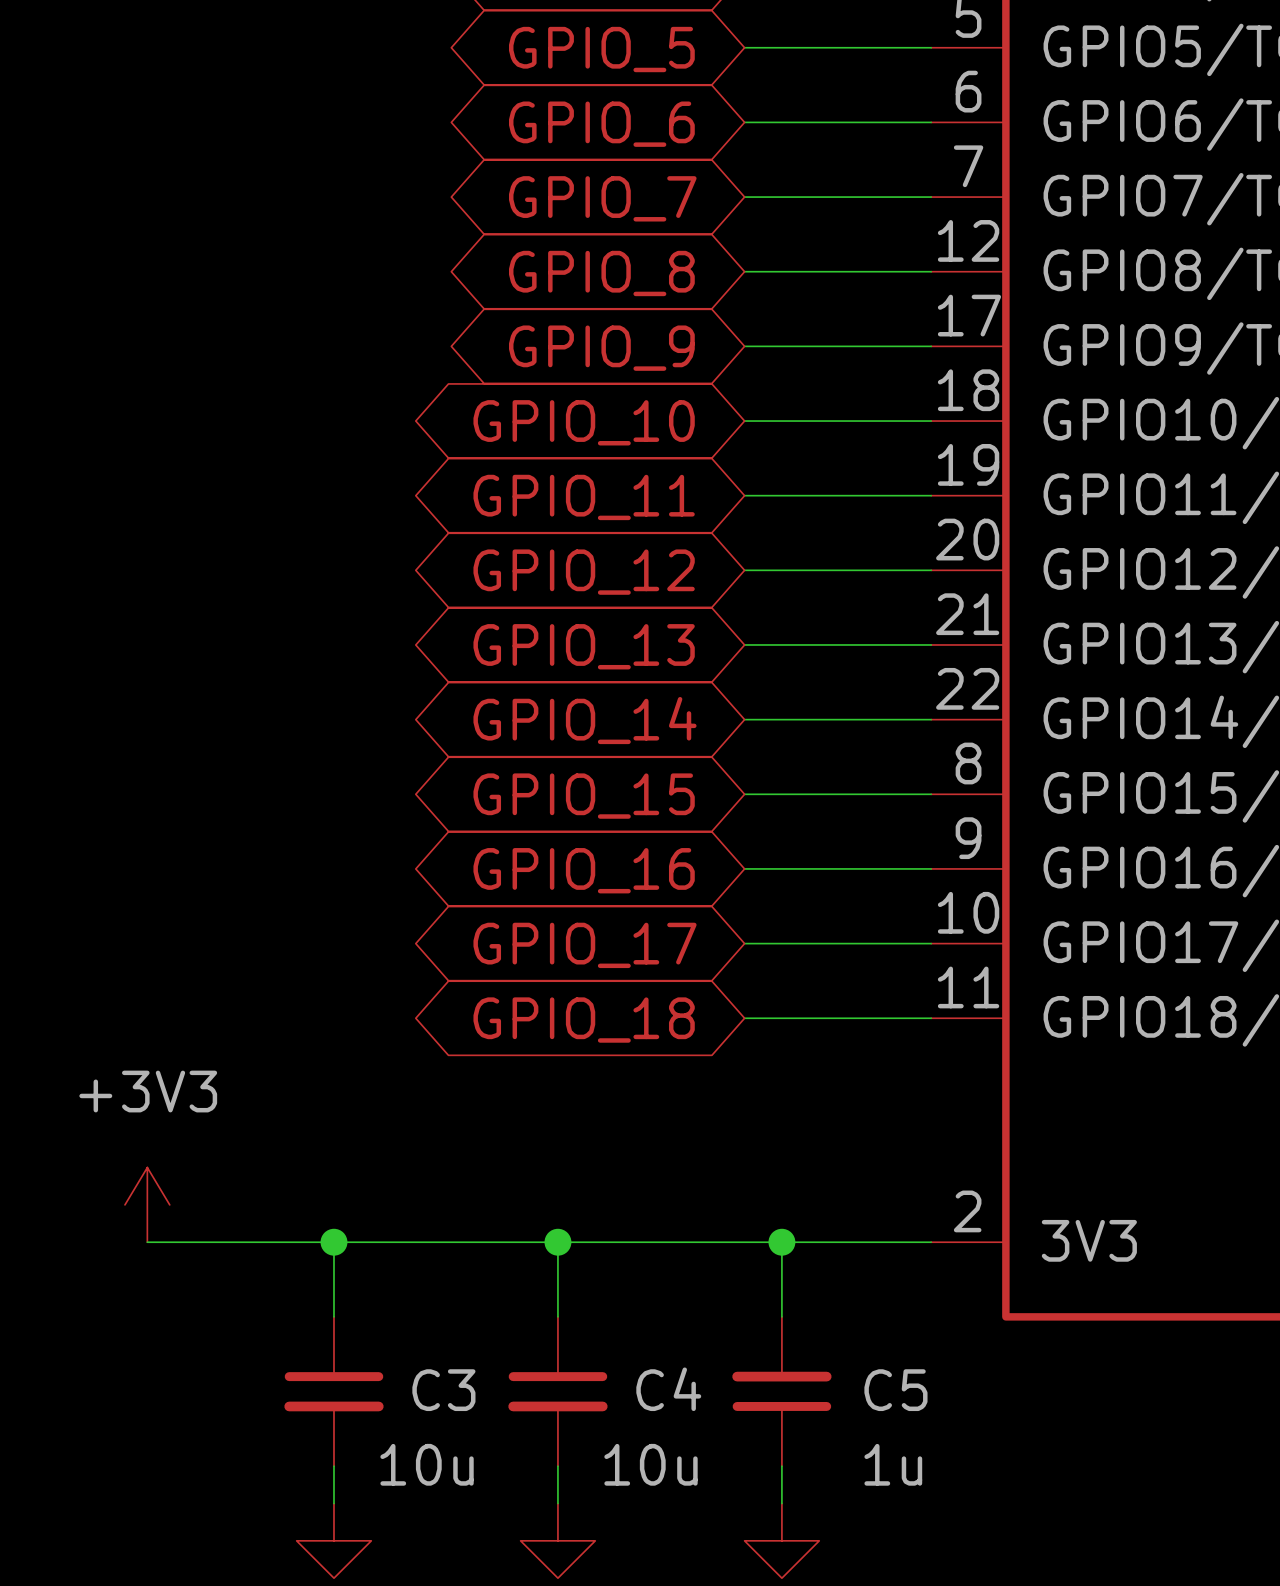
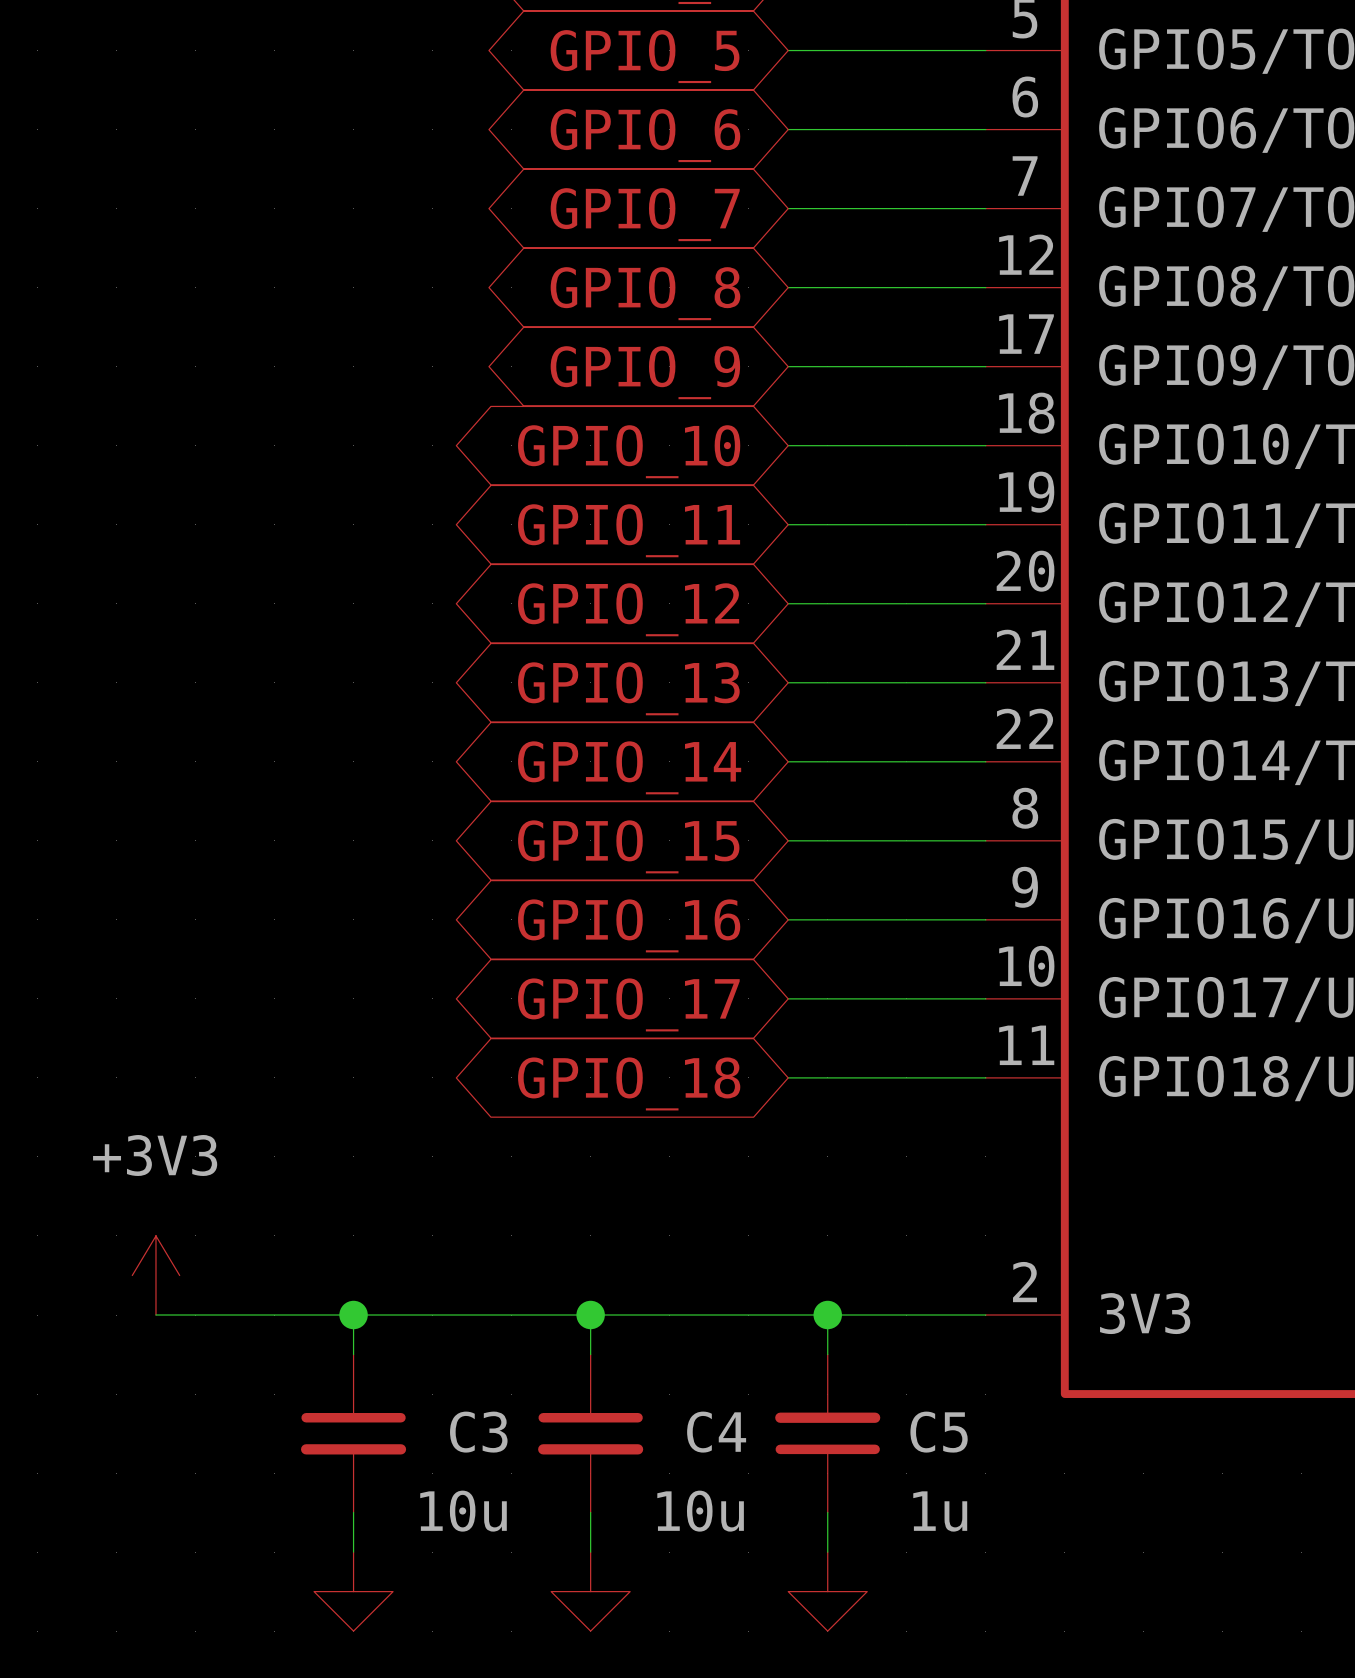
C3 position: (333, 1391) -> (353, 1433)
C4 position: (557, 1391) -> (590, 1433)
C5 position: (781, 1391) -> (827, 1433)
power symbol position: (333, 1540) -> (353, 1591)
power symbol position: (557, 1540) -> (590, 1591)
power symbol position: (781, 1540) -> (827, 1591)

